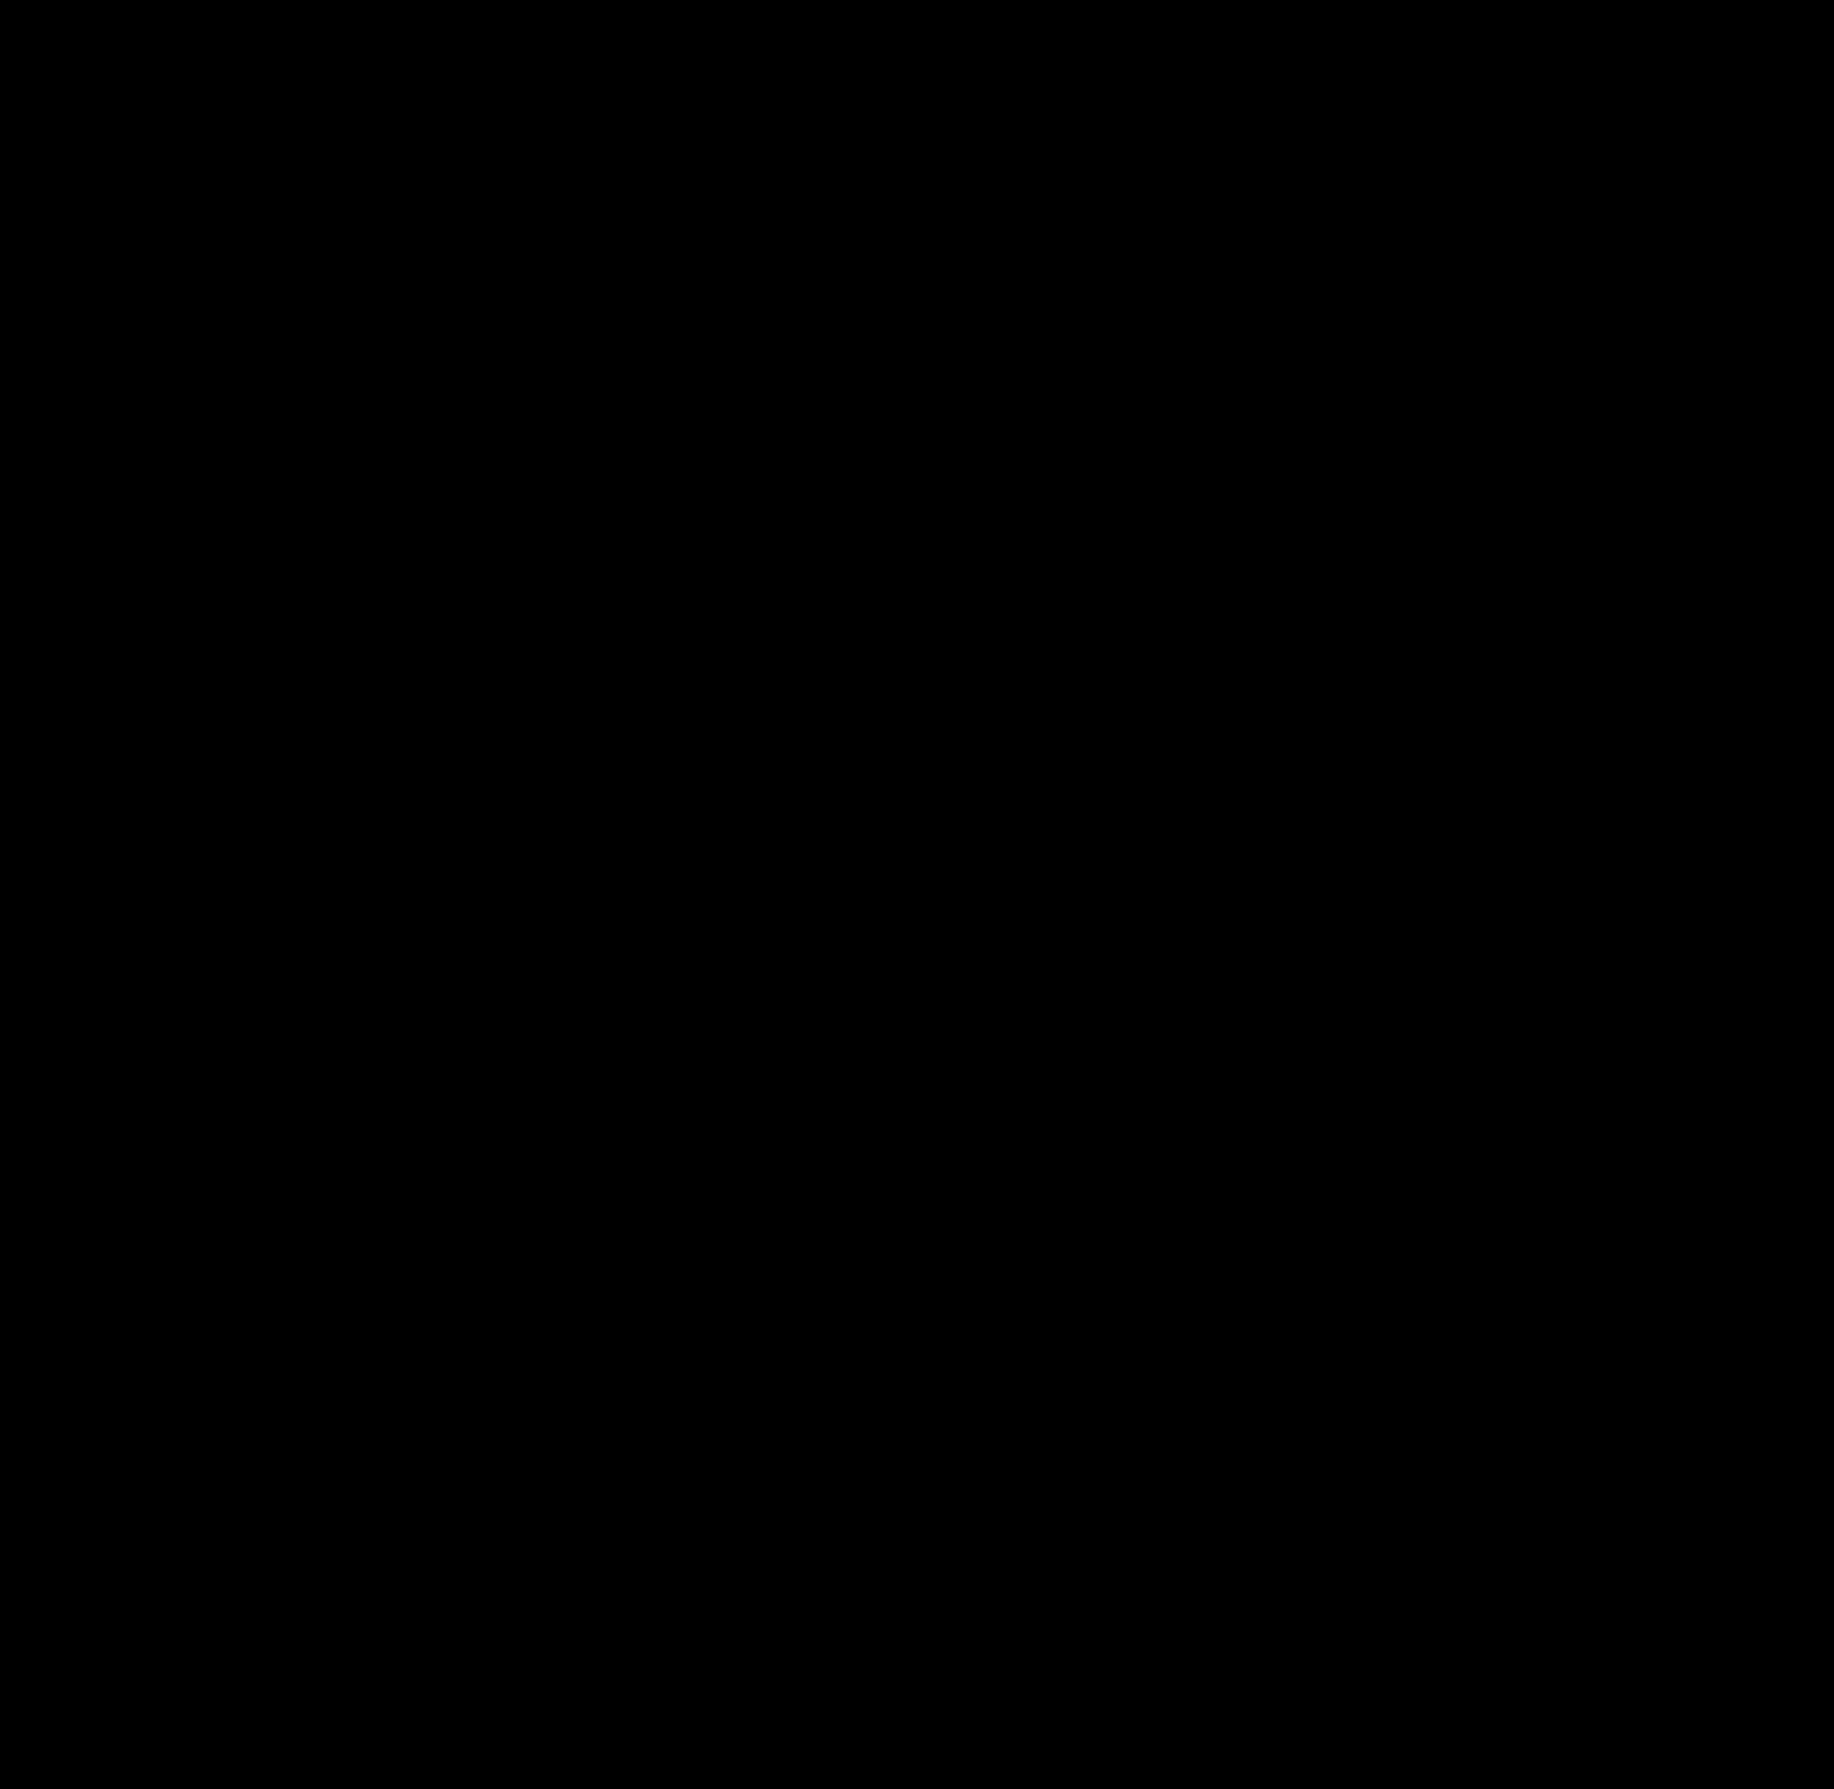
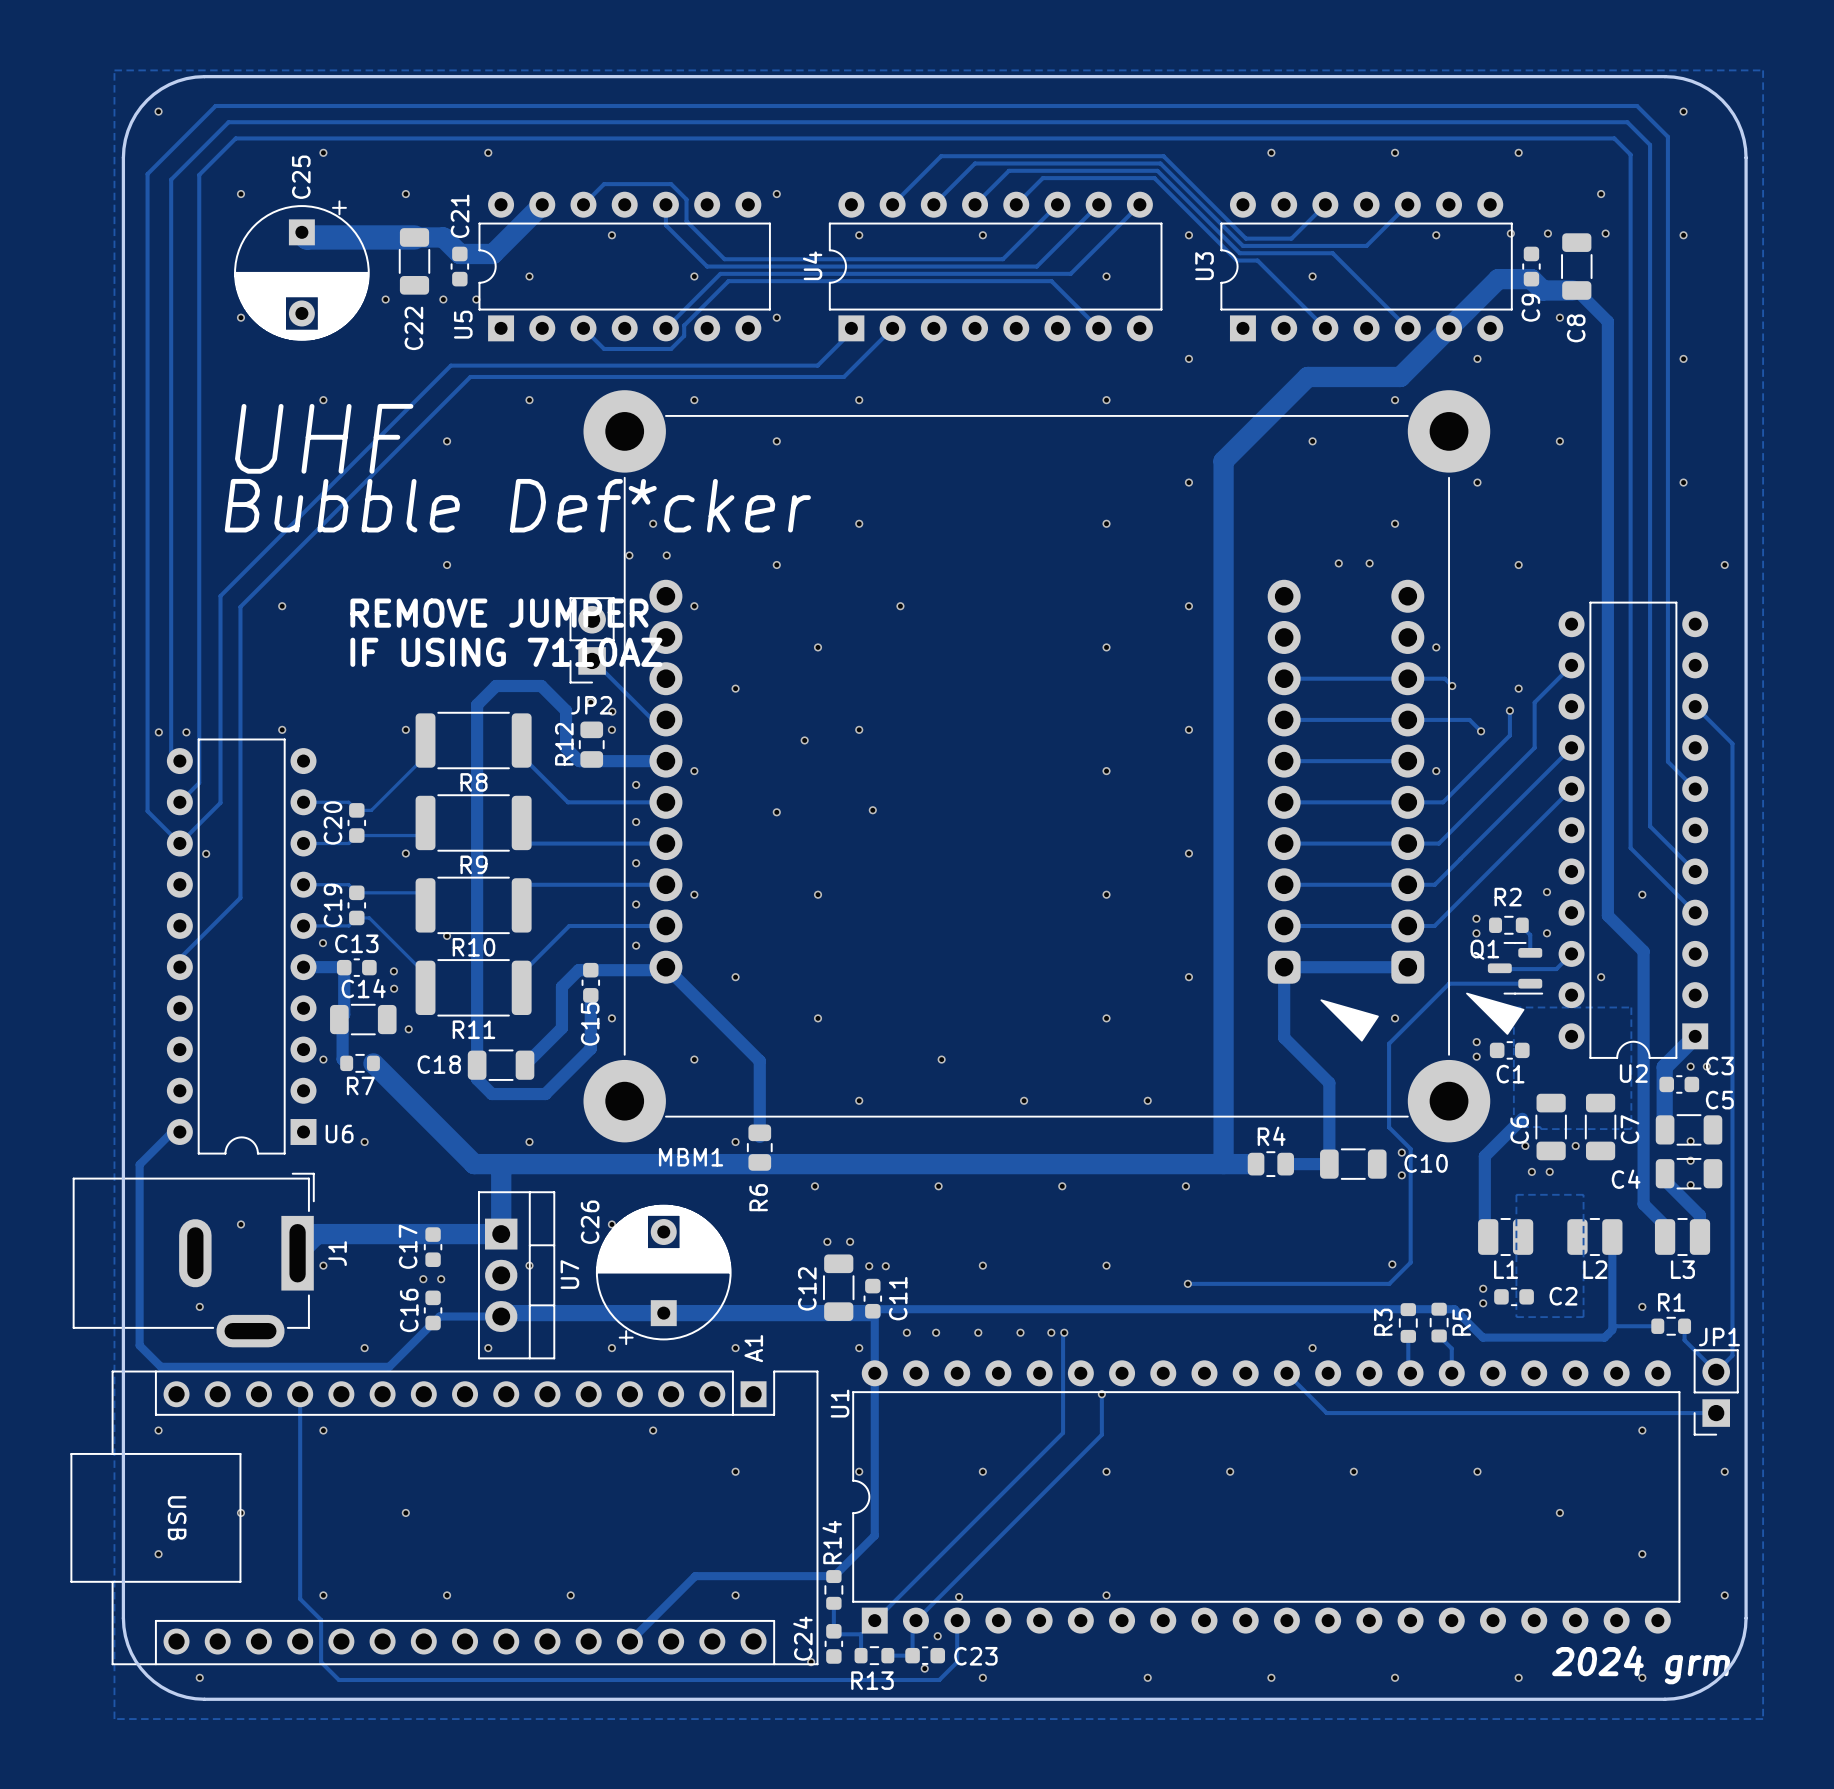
zone outline: none -> (114, 70) (1763, 70) (1763, 1719) (114, 1719) (114, 70)
board edge: none -> (204, 76) (1664, 76) (1691, 81) (1708, 89) (1722, 100) (1738, 122) (1744, 139) (1746, 157) (1746, 1618) (1744, 1636) (1738, 1653) (1722, 1675) (1708, 1686) (1691, 1694) (1664, 1699) (204, 1699) (177, 1694) (161, 1686) (147, 1675) (131, 1653) (125, 1636) (123, 1618) (123, 157) (125, 139) (131, 122) (147, 100) (169, 84) (186, 78) (204, 76)
via: none -> (158, 111)
via: none -> (1683, 111)
via: none -> (323, 152)
via: none -> (488, 152)
via: none -> (1271, 152)
via: none -> (1395, 152)
via: none -> (1518, 152)
via: none -> (240, 194)
via: none -> (405, 194)
via: none -> (776, 194)
via: none -> (1601, 194)
track: none -> (542, 204) (493, 253) (459, 253) (443, 237) (418, 237)
track: none -> (583, 204) (604, 184) (671, 184) (686, 199) (686, 221) (724, 259) (1002, 259) (1057, 204)
track: none -> (665, 204) (665, 225) (707, 266) (1036, 266) (1098, 204)
track: none -> (892, 204) (941, 156) (1163, 156) (1245, 238) (1291, 238) (1325, 204)
track: none -> (933, 204) (975, 163) (1160, 163) (1242, 245) (1366, 245) (1407, 204)
track: none -> (975, 204) (1008, 170) (1157, 170) (1239, 253) (1332, 253) (1407, 328)
track: none -> (1016, 204) (1042, 178) (1154, 178) (1236, 260) (1257, 260) (1325, 328)
track: none -> (1139, 204) (1070, 273) (720, 273) (665, 328)
track: none -> (301, 232) (307, 237) (414, 237)
via: none -> (1510, 233)
via: none -> (1547, 233)
via: none -> (1605, 233)
via: none -> (611, 235)
via: none -> (859, 235)
via: none -> (982, 235)
via: none -> (1188, 235)
via: none -> (1436, 235)
via: none -> (1683, 235)
C22: none -> (414, 261)
C21: none -> (459, 266)
U5: none -> (624, 266)
U4: none -> (995, 266)
U3: none -> (1366, 266)
C9: none -> (1531, 266)
C8: none -> (1576, 266)
C25: none -> (301, 270)
via: none -> (529, 276)
via: none -> (694, 276)
via: none -> (1106, 276)
via: none -> (1312, 276)
track: none -> (1572, 290) (1542, 290) (1531, 279) (1498, 279) (1400, 376) (1307, 376) (1223, 461) (1223, 1164)
track: none -> (1576, 290) (1607, 321) (1607, 915) (1643, 951) (1643, 1204) (1665, 1225)
via: none -> (385, 299)
via: none -> (443, 299)
via: none -> (476, 299)
via: none -> (240, 317)
via: none -> (776, 317)
via: none -> (1559, 317)
track: none -> (583, 328) (604, 348) (671, 348) (684, 335) (684, 325) (728, 281) (1051, 281) (1098, 328)
track: none -> (892, 328) (844, 376) (470, 376) (240, 606) (240, 897) (171, 967)
track: none -> (851, 331) (817, 365) (450, 365) (220, 596) (220, 802) (179, 843) (147, 811) (147, 174) (215, 106) (1637, 106) (1667, 136) (1667, 761) (1695, 789)
via: none -> (1188, 358)
via: none -> (1477, 358)
via: none -> (1683, 358)
via: none -> (323, 400)
via: none -> (529, 400)
via: none -> (694, 400)
via: none -> (859, 400)
via: none -> (1106, 400)
via: none -> (1395, 400)
text: none -> UHF (324, 438)
via: none -> (447, 441)
via: none -> (776, 441)
via: none -> (1312, 441)
via: none -> (1559, 441)
via: none -> (1188, 482)
via: none -> (1477, 482)
via: none -> (1683, 482)
text: none -> Bubble Def*cker (517, 505)
via: none -> (653, 523)
via: none -> (859, 523)
via: none -> (1106, 523)
via: none -> (1395, 523)
via: none -> (629, 555)
via: none -> (666, 555)
via: none -> (1338, 563)
via: none -> (1369, 563)
via: none -> (447, 564)
via: none -> (776, 564)
via: none -> (1518, 564)
via: none -> (1724, 564)
via: none -> (282, 606)
via: none -> (694, 606)
via: none -> (900, 606)
via: none -> (1188, 606)
text: none -> REMOVE JUMPER (499, 613)
JP2: none -> (592, 640)
via: none -> (818, 647)
via: none -> (1106, 647)
via: none -> (1436, 647)
text: none -> IF USING 7110AZ (506, 652)
track: none -> (593, 660) (652, 719)
track: none -> (1571, 665) (1534, 702) (1534, 747) (1438, 843) (1284, 843)
track: none -> (1284, 678) (1444, 678) (1452, 686)
via: none -> (1452, 686)
via: none -> (735, 688)
via: none -> (1518, 688)
via: none -> (590, 702)
track: none -> (1695, 706) (1732, 743) (1732, 1355) (1716, 1371) (1684, 1340) (1684, 1326)
track: none -> (1509, 710) (1509, 735) (1443, 802) (1284, 802)
via: none -> (1509, 710)
via: none -> (612, 711)
track: none -> (1284, 719) (1469, 719) (1481, 731)
via: none -> (282, 729)
via: none -> (405, 729)
via: none -> (611, 729)
via: none -> (859, 729)
via: none -> (1188, 729)
via: none -> (1481, 731)
via: none -> (158, 732)
via: none -> (186, 732)
R8: none -> (473, 740)
via: none -> (804, 740)
R12: none -> (591, 744)
track: none -> (1571, 747) (1460, 858)
track: none -> (521, 755) (568, 802) (665, 802)
track: none -> (425, 756) (371, 810) (356, 810) (348, 802) (294, 802)
track: none -> (171, 761) (171, 179) (228, 122) (1627, 122) (1650, 144) (1650, 826) (1695, 871)
track: none -> (597, 761) (665, 761) (579, 761) (566, 747) (566, 710) (541, 686) (496, 686) (477, 704) (477, 1079) (491, 1094) (545, 1094) (590, 1048) (590, 995)
track: none -> (1284, 761) (1407, 761)
MBM1: none -> (1053, 766)
via: none -> (694, 771)
via: none -> (1106, 771)
via: none -> (1436, 771)
via: none -> (636, 784)
track: none -> (1571, 789) (1434, 926) (1284, 926)
track: none -> (179, 802) (199, 782) (199, 174) (235, 138) (1614, 138) (1630, 154) (1630, 848) (1695, 912)
via: none -> (872, 810)
via: none -> (776, 812)
C20: none -> (356, 822)
R9: none -> (473, 822)
via: none -> (636, 822)
U2: none -> (1633, 830)
track: none -> (425, 835) (356, 835) (348, 843) (294, 843)
track: none -> (521, 843) (665, 843)
via: none -> (206, 853)
via: none -> (405, 853)
via: none -> (1188, 853)
track: none -> (1460, 859) (1434, 884) (1284, 884)
via: none -> (636, 863)
track: none -> (294, 884) (348, 884) (356, 892) (425, 892)
track: none -> (521, 884) (665, 884)
via: none -> (1547, 892)
via: none -> (694, 894)
via: none -> (818, 894)
via: none -> (1106, 894)
via: none -> (1642, 894)
via: none -> (636, 904)
C19: none -> (356, 905)
R10: none -> (473, 905)
via: none -> (1476, 918)
track: none -> (294, 925) (348, 925) (356, 917) (369, 917) (425, 974)
R2: none -> (1508, 925)
track: none -> (665, 926) (569, 926) (528, 967)
track: none -> (1522, 927) (1530, 935) (1530, 952)
via: none -> (1476, 933)
via: none -> (1547, 933)
via: none -> (447, 935)
via: none -> (322, 943)
via: none -> (636, 945)
U6: none -> (241, 946)
track: none -> (1571, 953) (1556, 969) (1500, 969)
track: none -> (303, 967) (344, 967)
track: none -> (344, 967) (344, 1014) (339, 1019)
C13: none -> (356, 967)
track: none -> (593, 967) (665, 967) (759, 1061) (759, 1136)
track: none -> (1407, 967) (1284, 967) (1284, 1037) (1329, 1082) (1329, 1164) (1285, 1164)
Q1: none -> (1515, 968)
track: none -> (662, 970) (578, 970) (561, 986) (561, 1028) (524, 1065)
via: none -> (393, 971)
via: none -> (735, 977)
via: none -> (1188, 977)
via: none -> (1601, 977)
C15: none -> (590, 982)
track: none -> (1530, 983) (1449, 983) (1389, 1043) (1389, 1127) (1410, 1148) (1410, 1262) (1389, 1283) (1187, 1283)
R11: none -> (473, 987)
via: none -> (394, 988)
zone outline: none -> (1513, 1007) (1513, 1127) (1540, 1127) (1540, 1129) (1631, 1129) (1631, 1007) (1513, 1007)
via: none -> (611, 1018)
via: none -> (818, 1018)
via: none -> (1106, 1018)
via: none -> (1395, 1018)
C14: none -> (363, 1019)
track: none -> (342, 1022) (342, 1059) (346, 1063)
via: none -> (408, 1029)
track: none -> (1695, 1036) (1664, 1067) (1664, 1126)
via: none -> (1476, 1042)
C1: none -> (1509, 1050)
via: none -> (1476, 1056)
via: none -> (323, 1059)
via: none -> (694, 1059)
via: none -> (941, 1059)
R7: none -> (360, 1063)
track: none -> (373, 1063) (474, 1164) (1247, 1164)
C18: none -> (501, 1065)
via: none -> (1690, 1066)
via: none -> (1706, 1066)
C3: none -> (1679, 1084)
via: none -> (859, 1100)
via: none -> (1024, 1100)
via: none -> (1147, 1100)
track: none -> (1522, 1118) (1484, 1156) (1484, 1233)
C6: none -> (1551, 1127)
C7: none -> (1600, 1127)
C5: none -> (1689, 1129)
track: none -> (172, 1132) (139, 1164) (139, 1345) (160, 1366) (389, 1366) (439, 1316) (501, 1316)
via: none -> (1690, 1141)
via: none -> (364, 1142)
via: none -> (529, 1142)
via: none -> (735, 1142)
via: none -> (1525, 1145)
via: none -> (1575, 1145)
R6: none -> (759, 1147)
via: none -> (1401, 1152)
via: none -> (1690, 1160)
track: none -> (497, 1164) (501, 1167) (501, 1234) (316, 1234) (297, 1253)
R4: none -> (1270, 1164)
C10: none -> (1353, 1164)
via: none -> (1531, 1171)
via: none -> (1549, 1171)
C4: none -> (1689, 1173)
via: none -> (1401, 1175)
track: none -> (1665, 1180) (1699, 1215) (1699, 1237)
via: none -> (1690, 1185)
via: none -> (814, 1186)
via: none -> (938, 1186)
via: none -> (1062, 1186)
via: none -> (1185, 1186)
zone outline: none -> (1516, 1194) (1583, 1194) (1583, 1317) (1516, 1317) (1516, 1194)
via: none -> (240, 1224)
via: none -> (611, 1224)
L1: none -> (1505, 1237)
L2: none -> (1594, 1237)
track: none -> (1612, 1237) (1612, 1329) (1604, 1337) (1482, 1337) (1454, 1309) (876, 1309)
L3: none -> (1682, 1237)
via: none -> (827, 1241)
via: none -> (850, 1241)
C17: none -> (433, 1247)
J1: none -> (193, 1260)
via: none -> (1392, 1264)
via: none -> (323, 1265)
via: none -> (529, 1265)
via: none -> (982, 1265)
via: none -> (1106, 1265)
via: none -> (869, 1266)
via: none -> (885, 1266)
C26: none -> (663, 1274)
U7: none -> (516, 1275)
via: none -> (423, 1279)
via: none -> (441, 1279)
via: none -> (1187, 1283)
C12: none -> (838, 1287)
via: none -> (1483, 1288)
C2: none -> (1514, 1296)
C11: none -> (872, 1298)
via: none -> (1483, 1303)
via: none -> (199, 1306)
via: none -> (1642, 1306)
C16: none -> (433, 1310)
track: none -> (874, 1311) (874, 1535) (834, 1576) (695, 1576) (629, 1641)
track: none -> (507, 1313) (872, 1313)
R5: none -> (1439, 1322)
R3: none -> (1408, 1323)
track: none -> (1657, 1326) (1616, 1326) (1608, 1334)
R1: none -> (1671, 1326)
via: none -> (906, 1332)
via: none -> (936, 1332)
via: none -> (978, 1332)
via: none -> (1020, 1332)
via: none -> (1051, 1332)
track: none -> (1064, 1332) (1063, 1432) (875, 1620)
via: none -> (1064, 1332)
track: none -> (1439, 1335) (1451, 1348) (1451, 1373)
track: none -> (1408, 1336) (1408, 1371)
via: none -> (364, 1348)
via: none -> (488, 1348)
via: none -> (611, 1348)
via: none -> (735, 1348)
via: none -> (859, 1348)
via: none -> (1312, 1348)
track: none -> (1286, 1373) (1326, 1413) (1716, 1413)
JP1: none -> (1716, 1392)
track: none -> (300, 1394) (300, 1599) (321, 1619) (321, 1662) (338, 1679) (939, 1679) (957, 1662) (957, 1620)
track: none -> (1101, 1394) (1101, 1434) (916, 1620)
via: none -> (1101, 1394)
via: none -> (158, 1430)
via: none -> (323, 1430)
via: none -> (653, 1430)
via: none -> (1642, 1430)
via: none -> (735, 1471)
via: none -> (859, 1471)
via: none -> (982, 1471)
via: none -> (1106, 1471)
via: none -> (1230, 1471)
via: none -> (1353, 1471)
via: none -> (1477, 1471)
via: none -> (1724, 1471)
U1: none -> (1266, 1496)
via: none -> (240, 1512)
via: none -> (405, 1512)
via: none -> (1559, 1512)
A1: none -> (444, 1517)
via: none -> (158, 1554)
via: none -> (1642, 1554)
R14: none -> (833, 1589)
via: none -> (323, 1595)
via: none -> (447, 1595)
via: none -> (570, 1595)
via: none -> (735, 1595)
via: none -> (1106, 1595)
via: none -> (1724, 1595)
via: none -> (959, 1597)
track: none -> (833, 1603) (833, 1631)
track: none -> (912, 1624) (912, 1655) (887, 1655)
track: none -> (836, 1634) (861, 1634) (861, 1655)
via: none -> (937, 1636)
C24: none -> (833, 1643)
R13: none -> (874, 1655)
C23: none -> (925, 1655)
via: none -> (811, 1662)
text: none -> 2024 grm (1641, 1665)
via: none -> (924, 1668)
via: none -> (199, 1677)
via: none -> (982, 1677)
via: none -> (1147, 1677)
via: none -> (1271, 1677)
via: none -> (1395, 1677)
via: none -> (1518, 1677)
via: none -> (1642, 1677)

